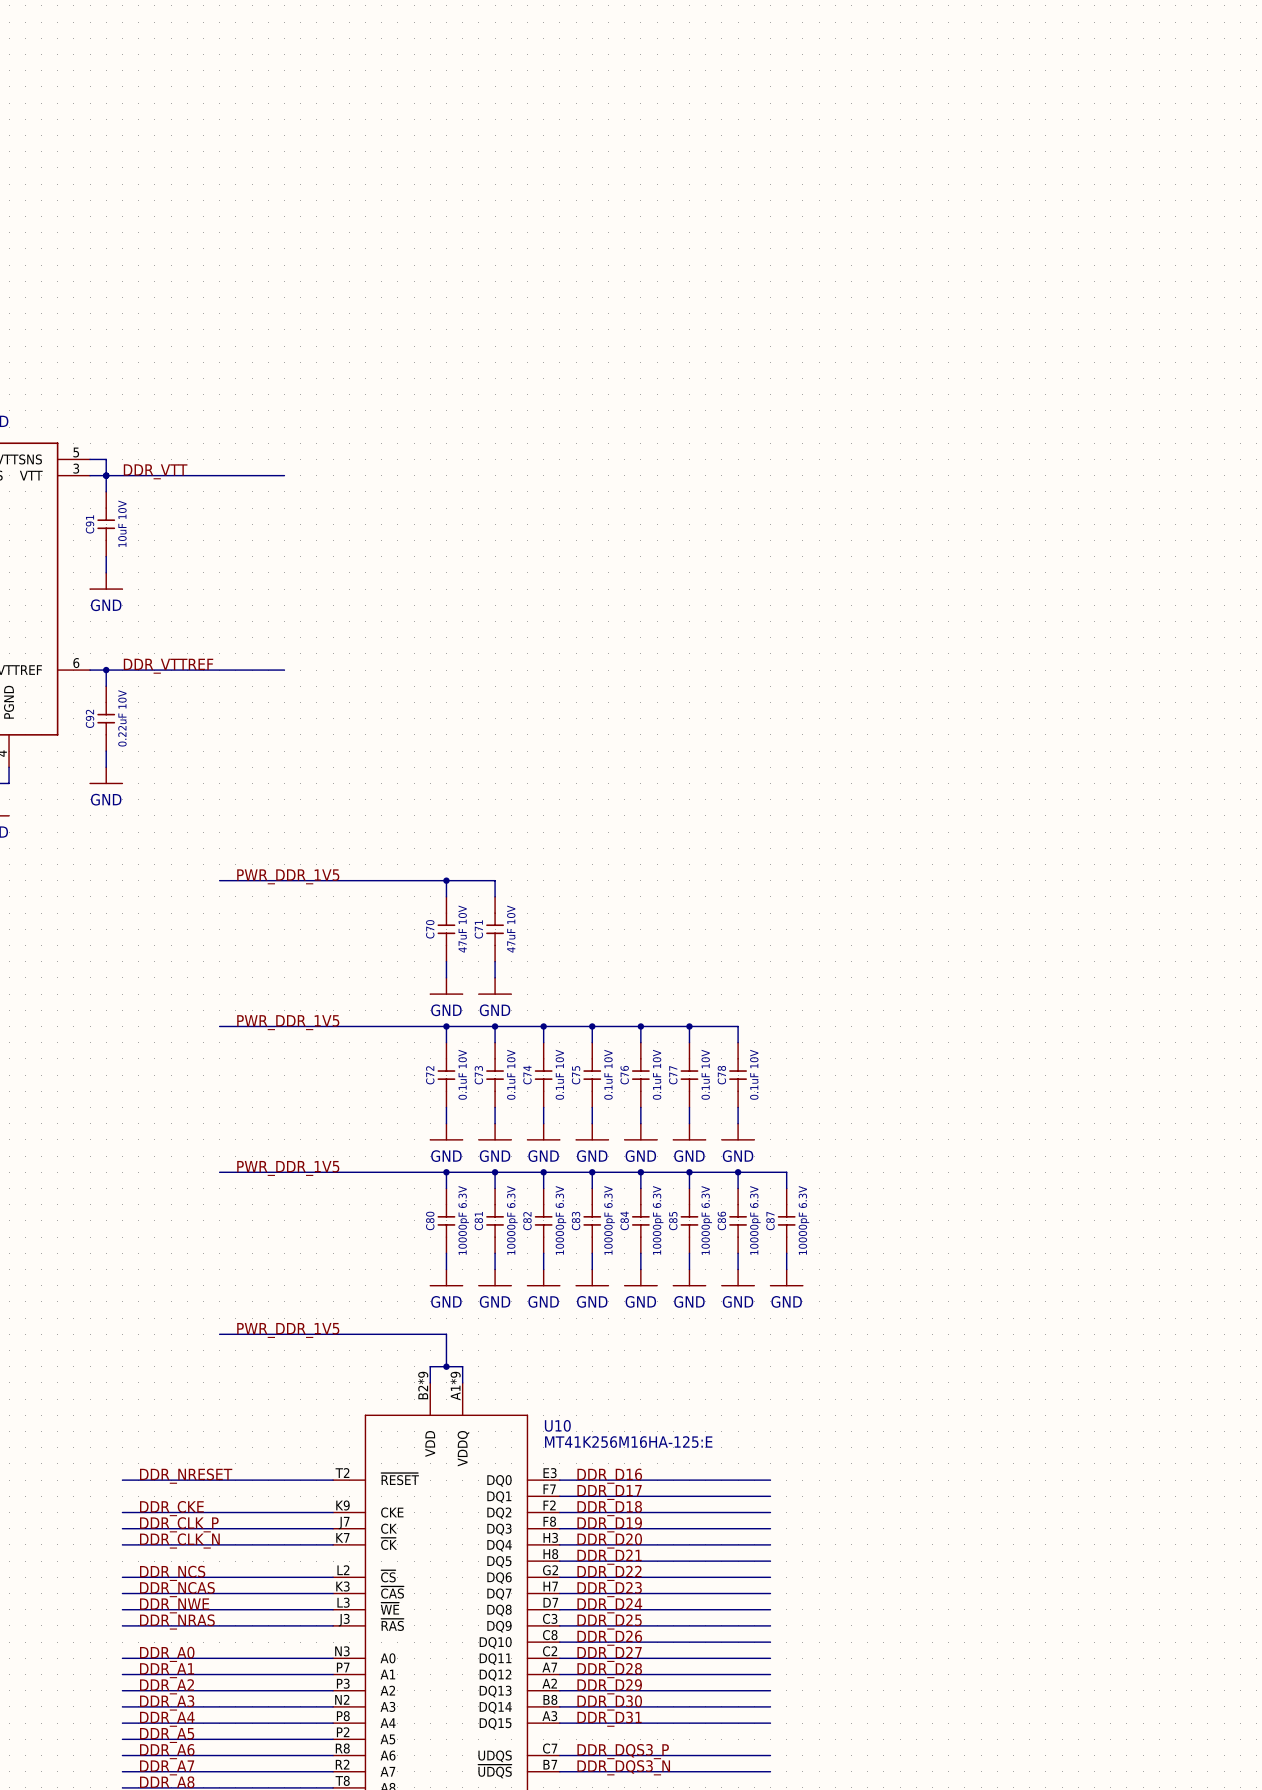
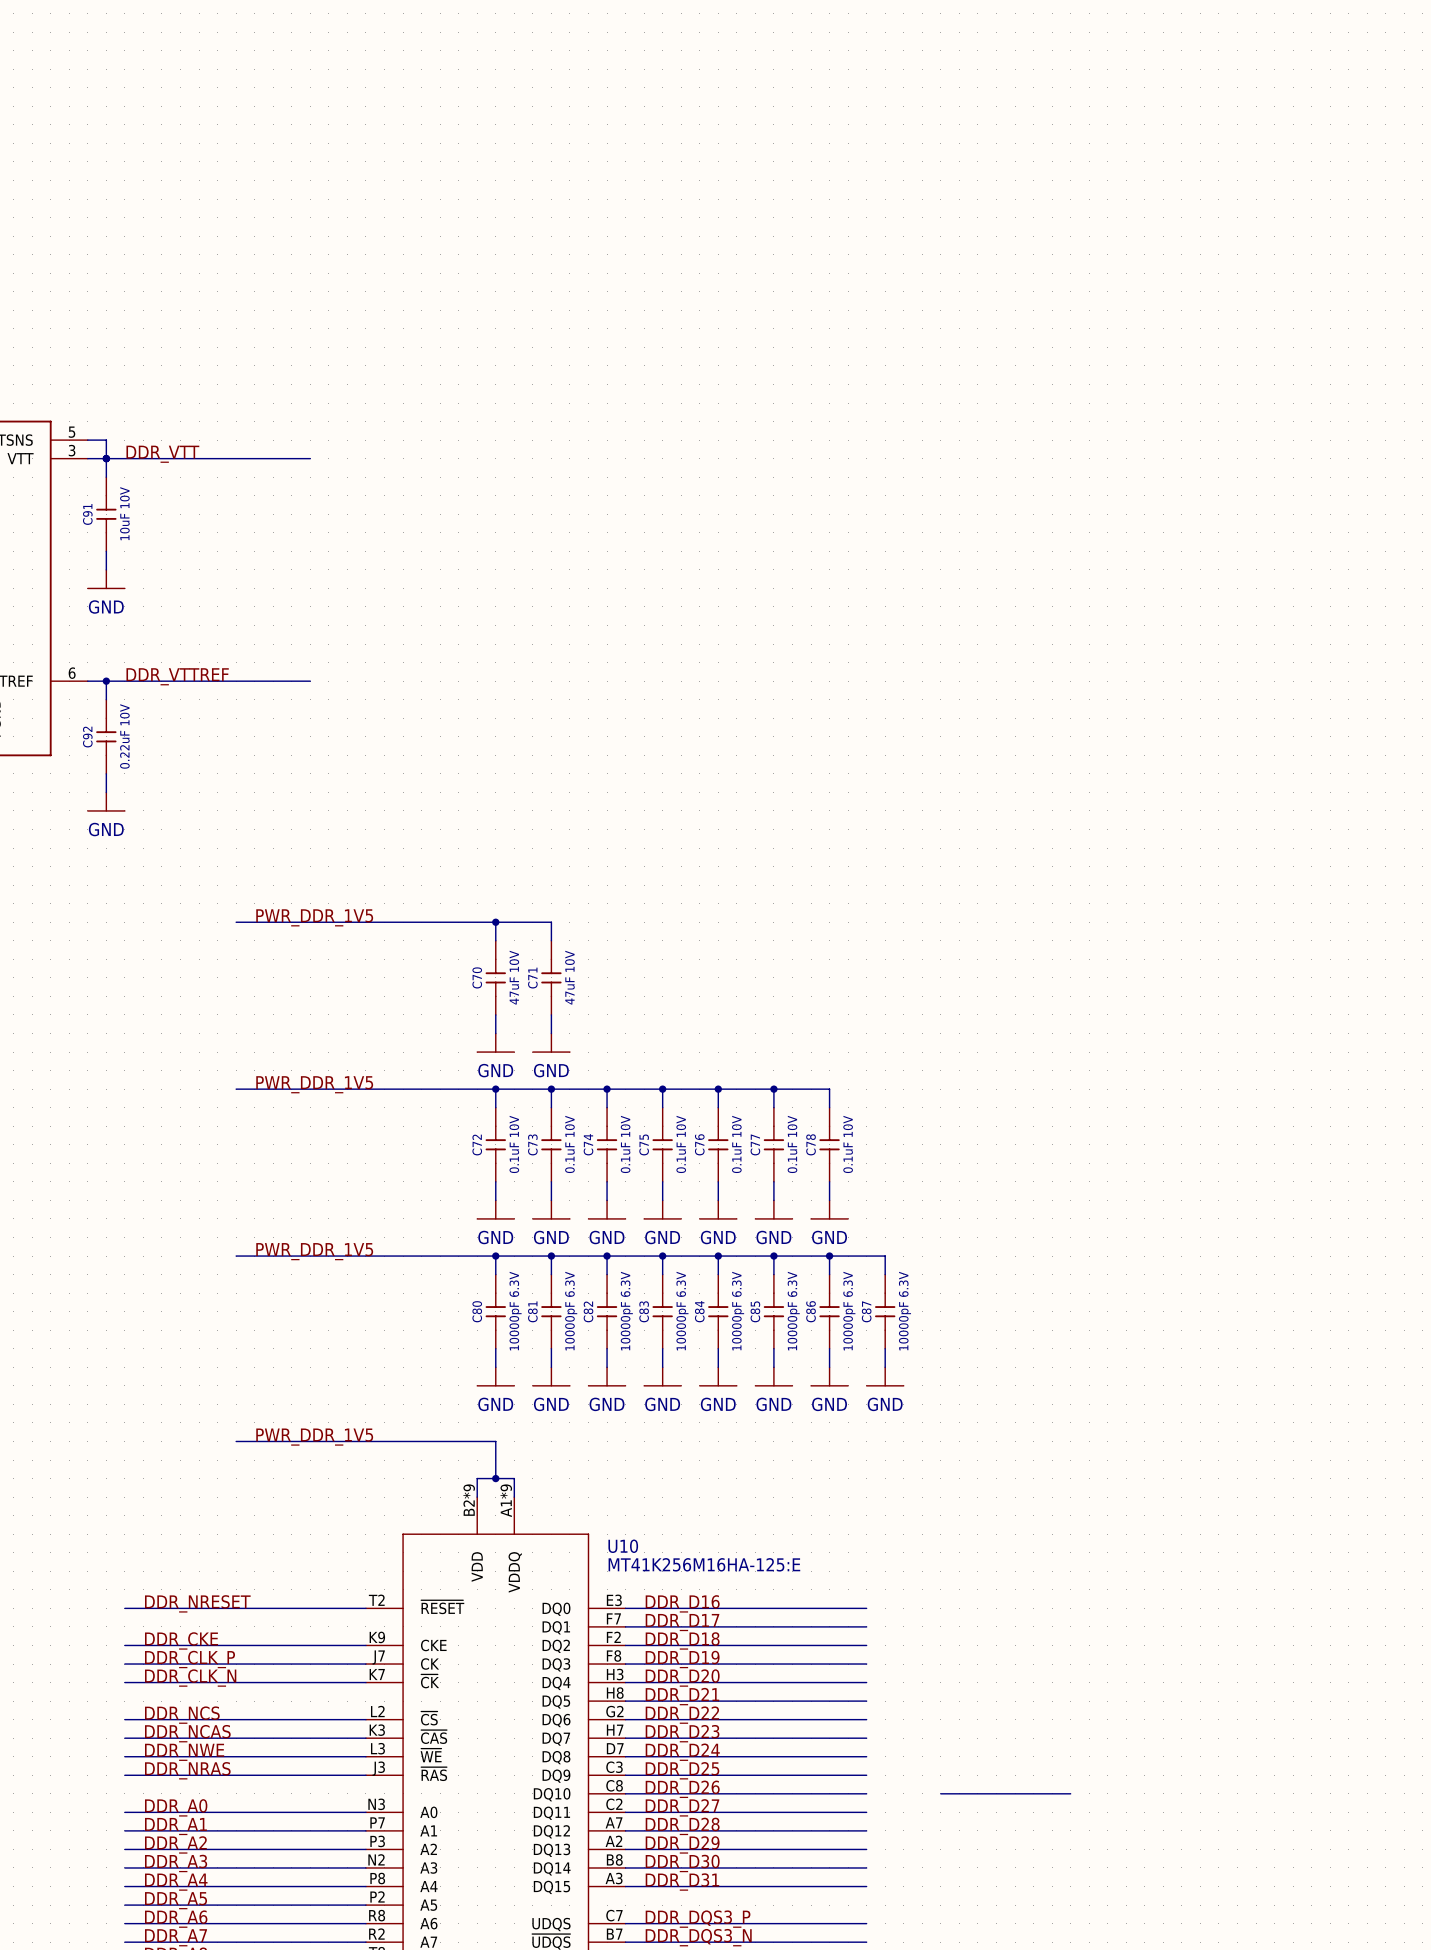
bus: none -> (940, 1793) (1070, 1793)

